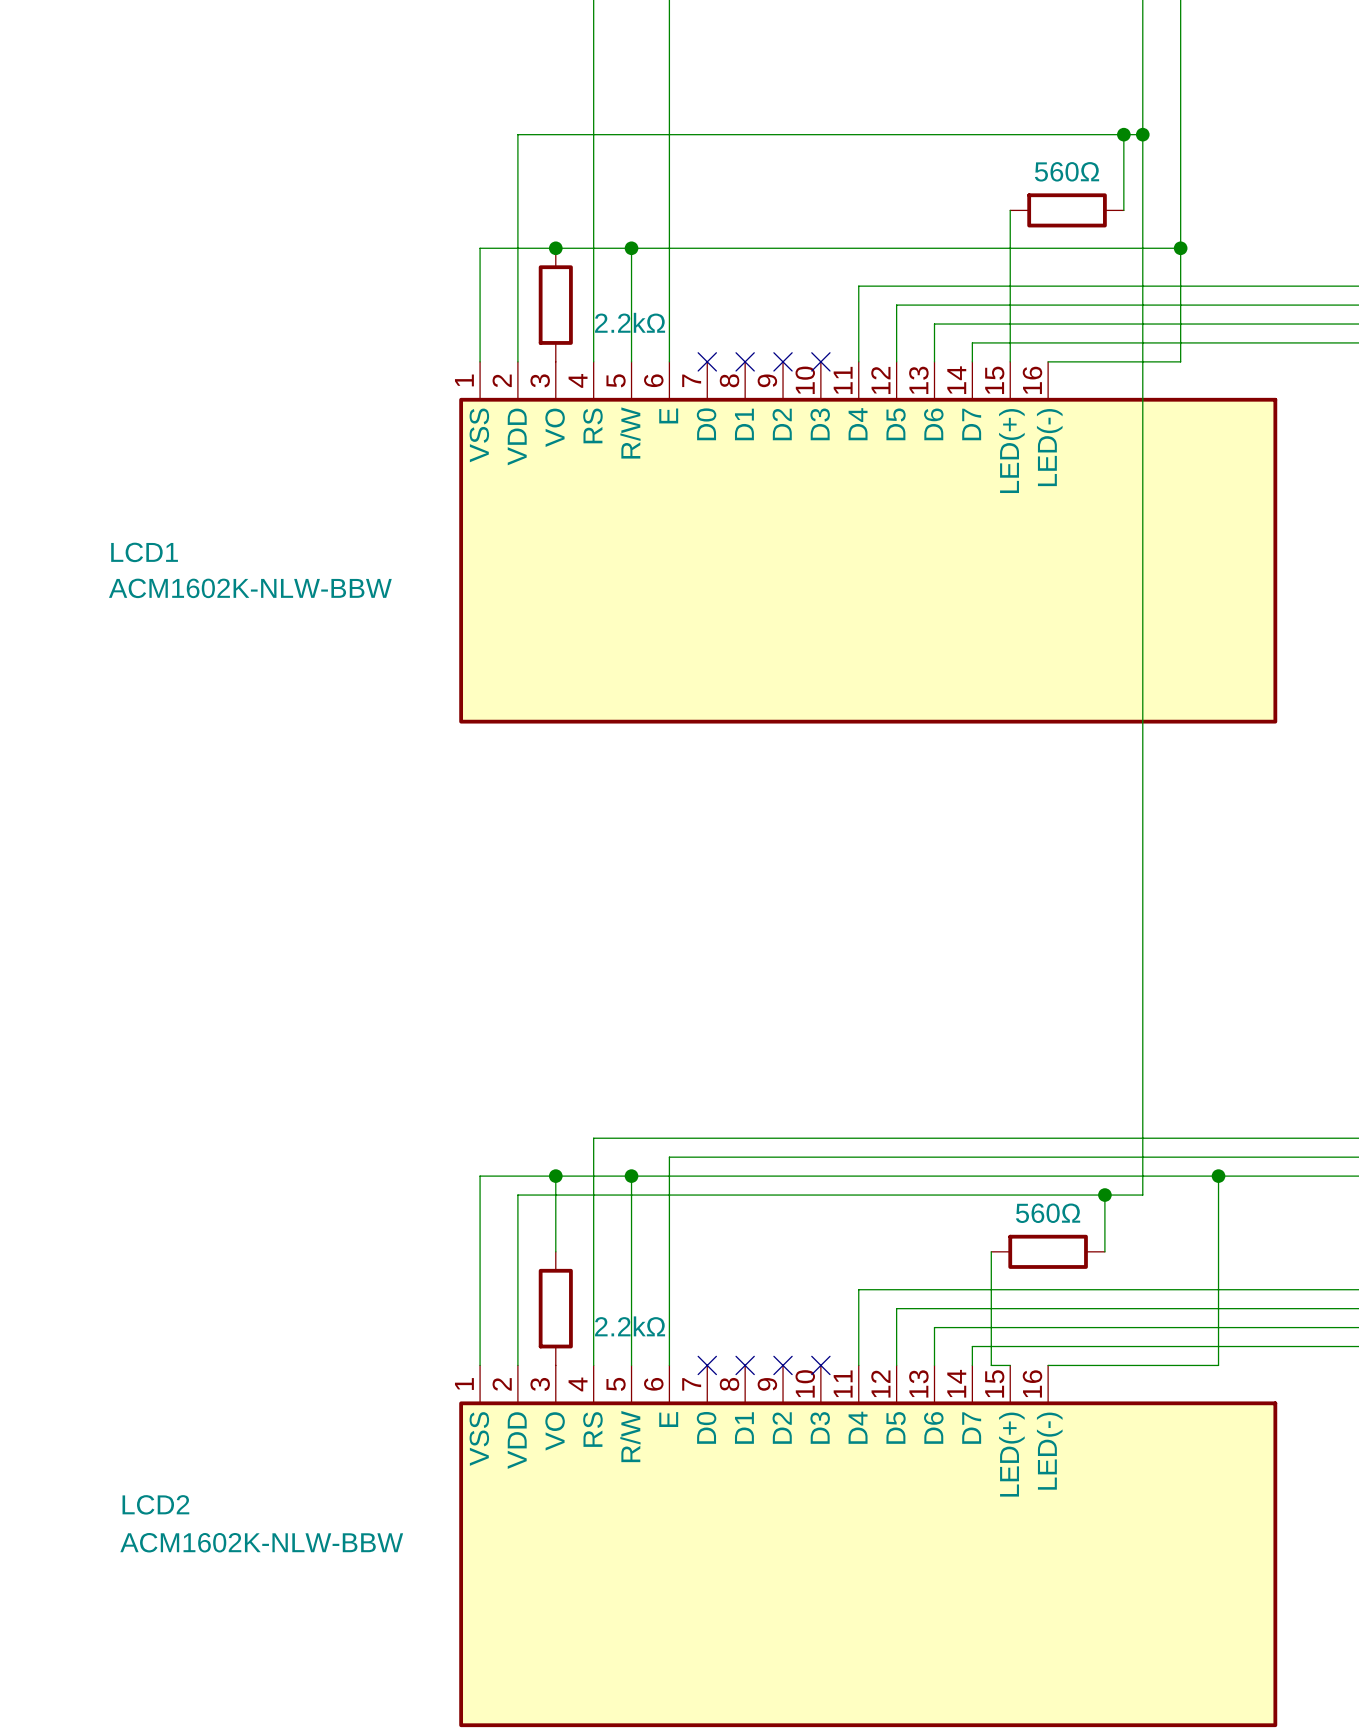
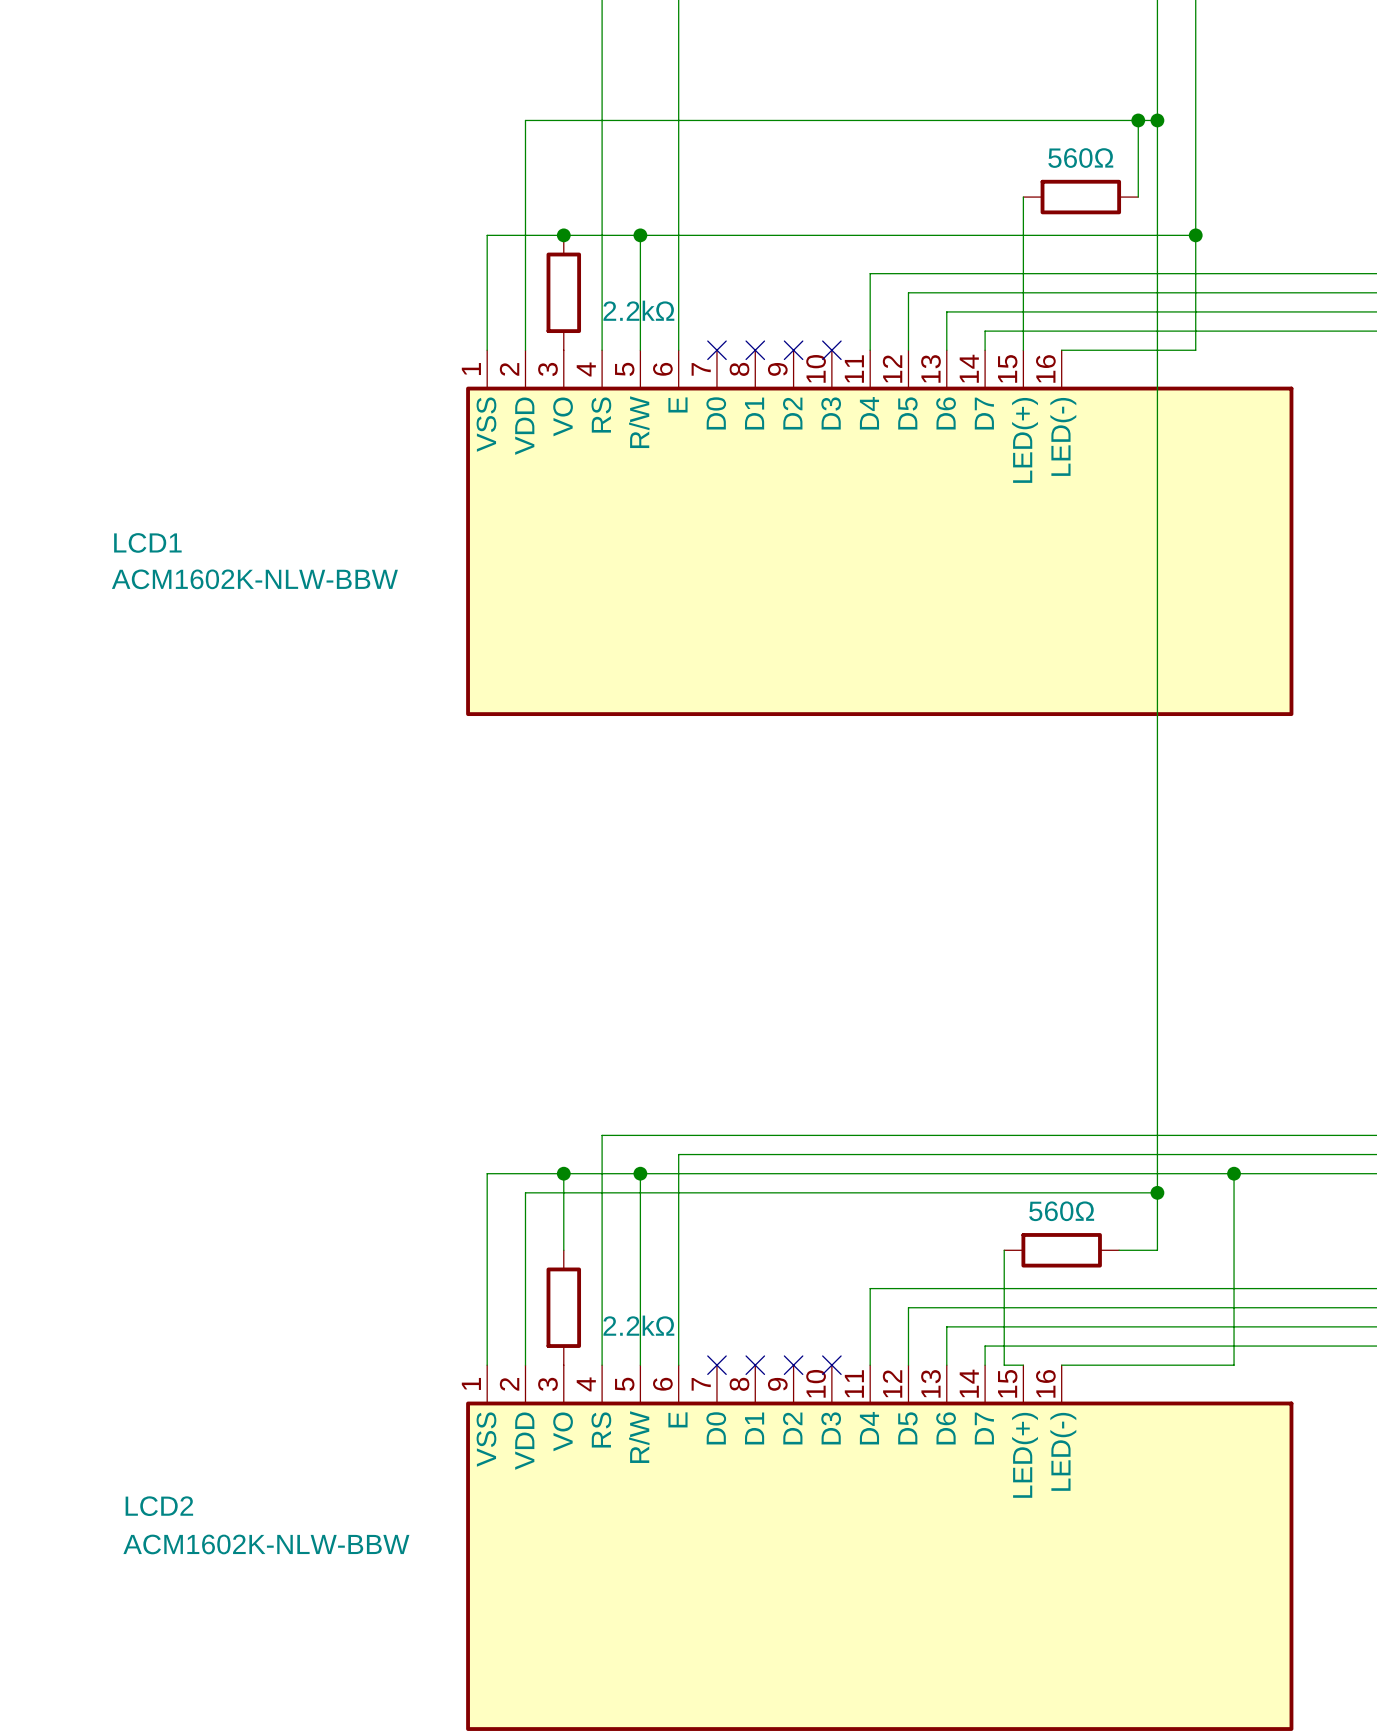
wire: (1104, 1195) (1104, 1251) -> (1157, 1192) (1157, 1250) (1119, 1250)
junction position: (1104, 1195) -> (1157, 1192)

